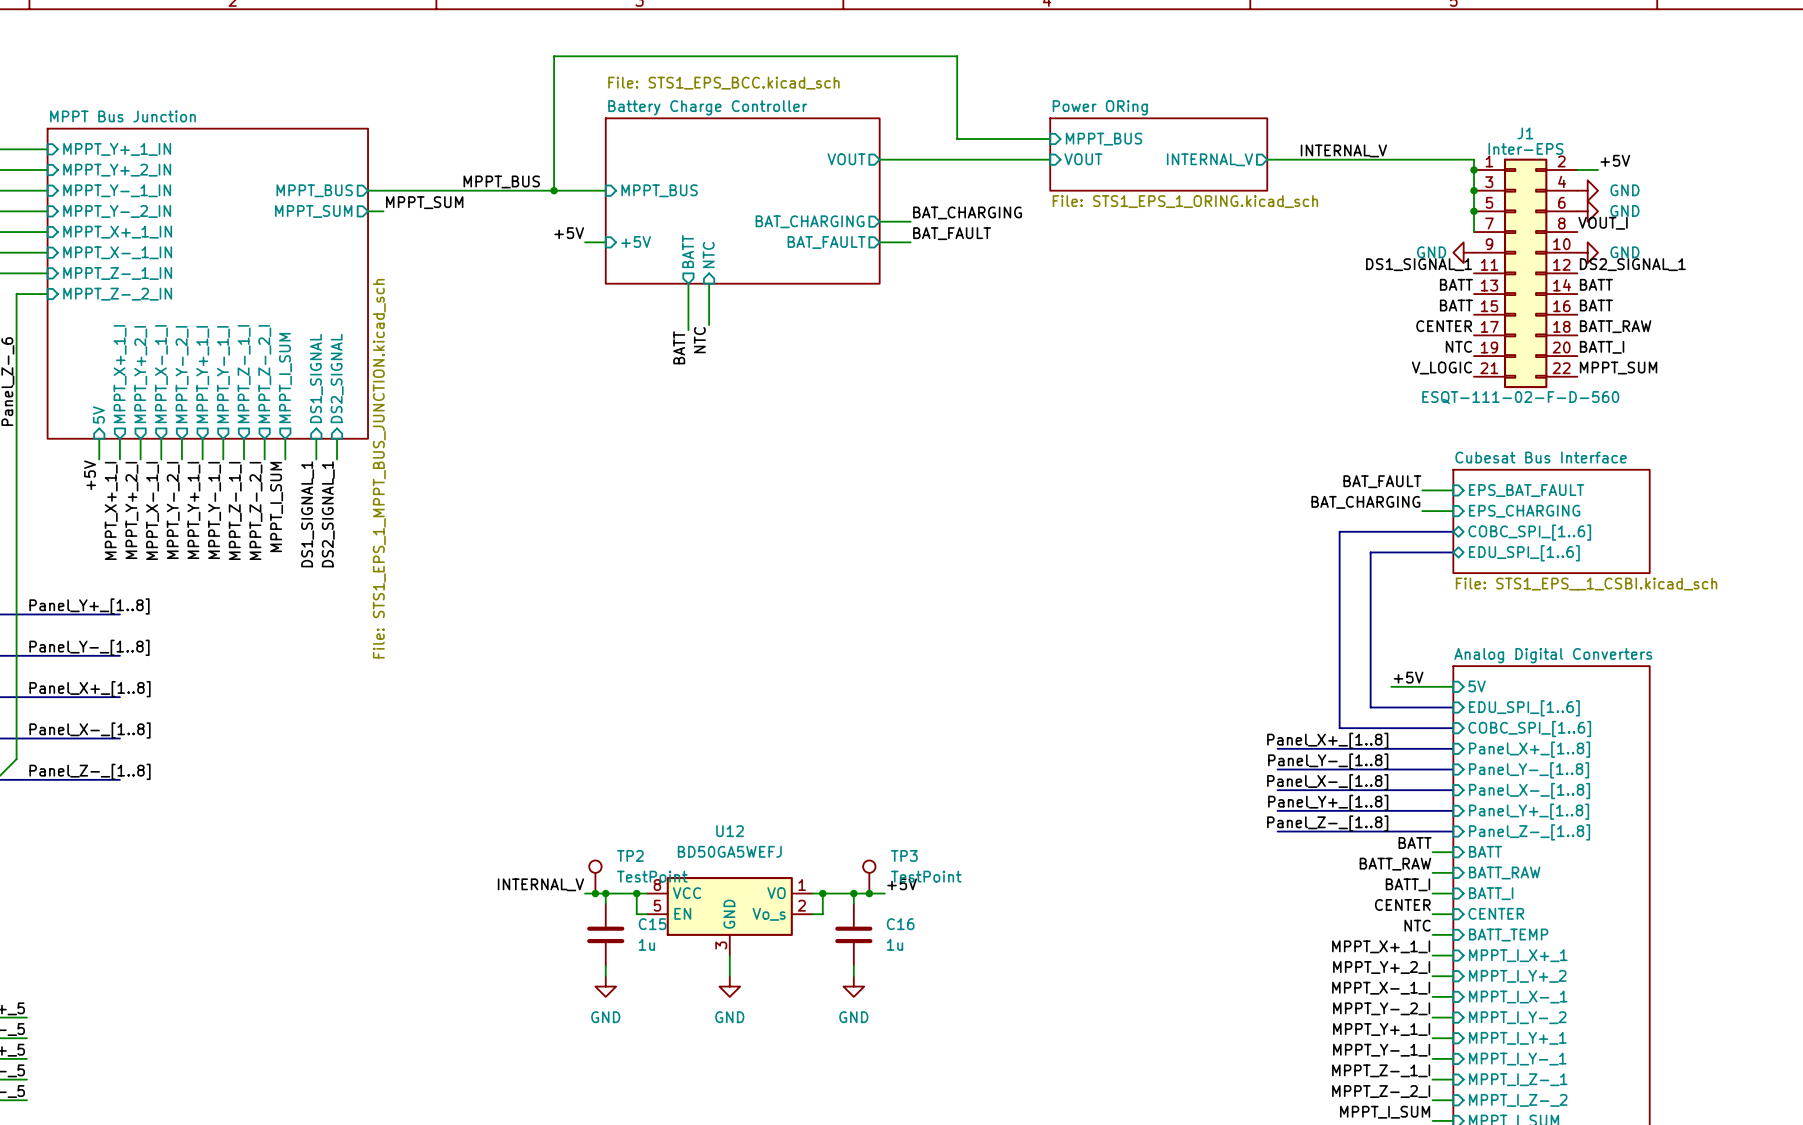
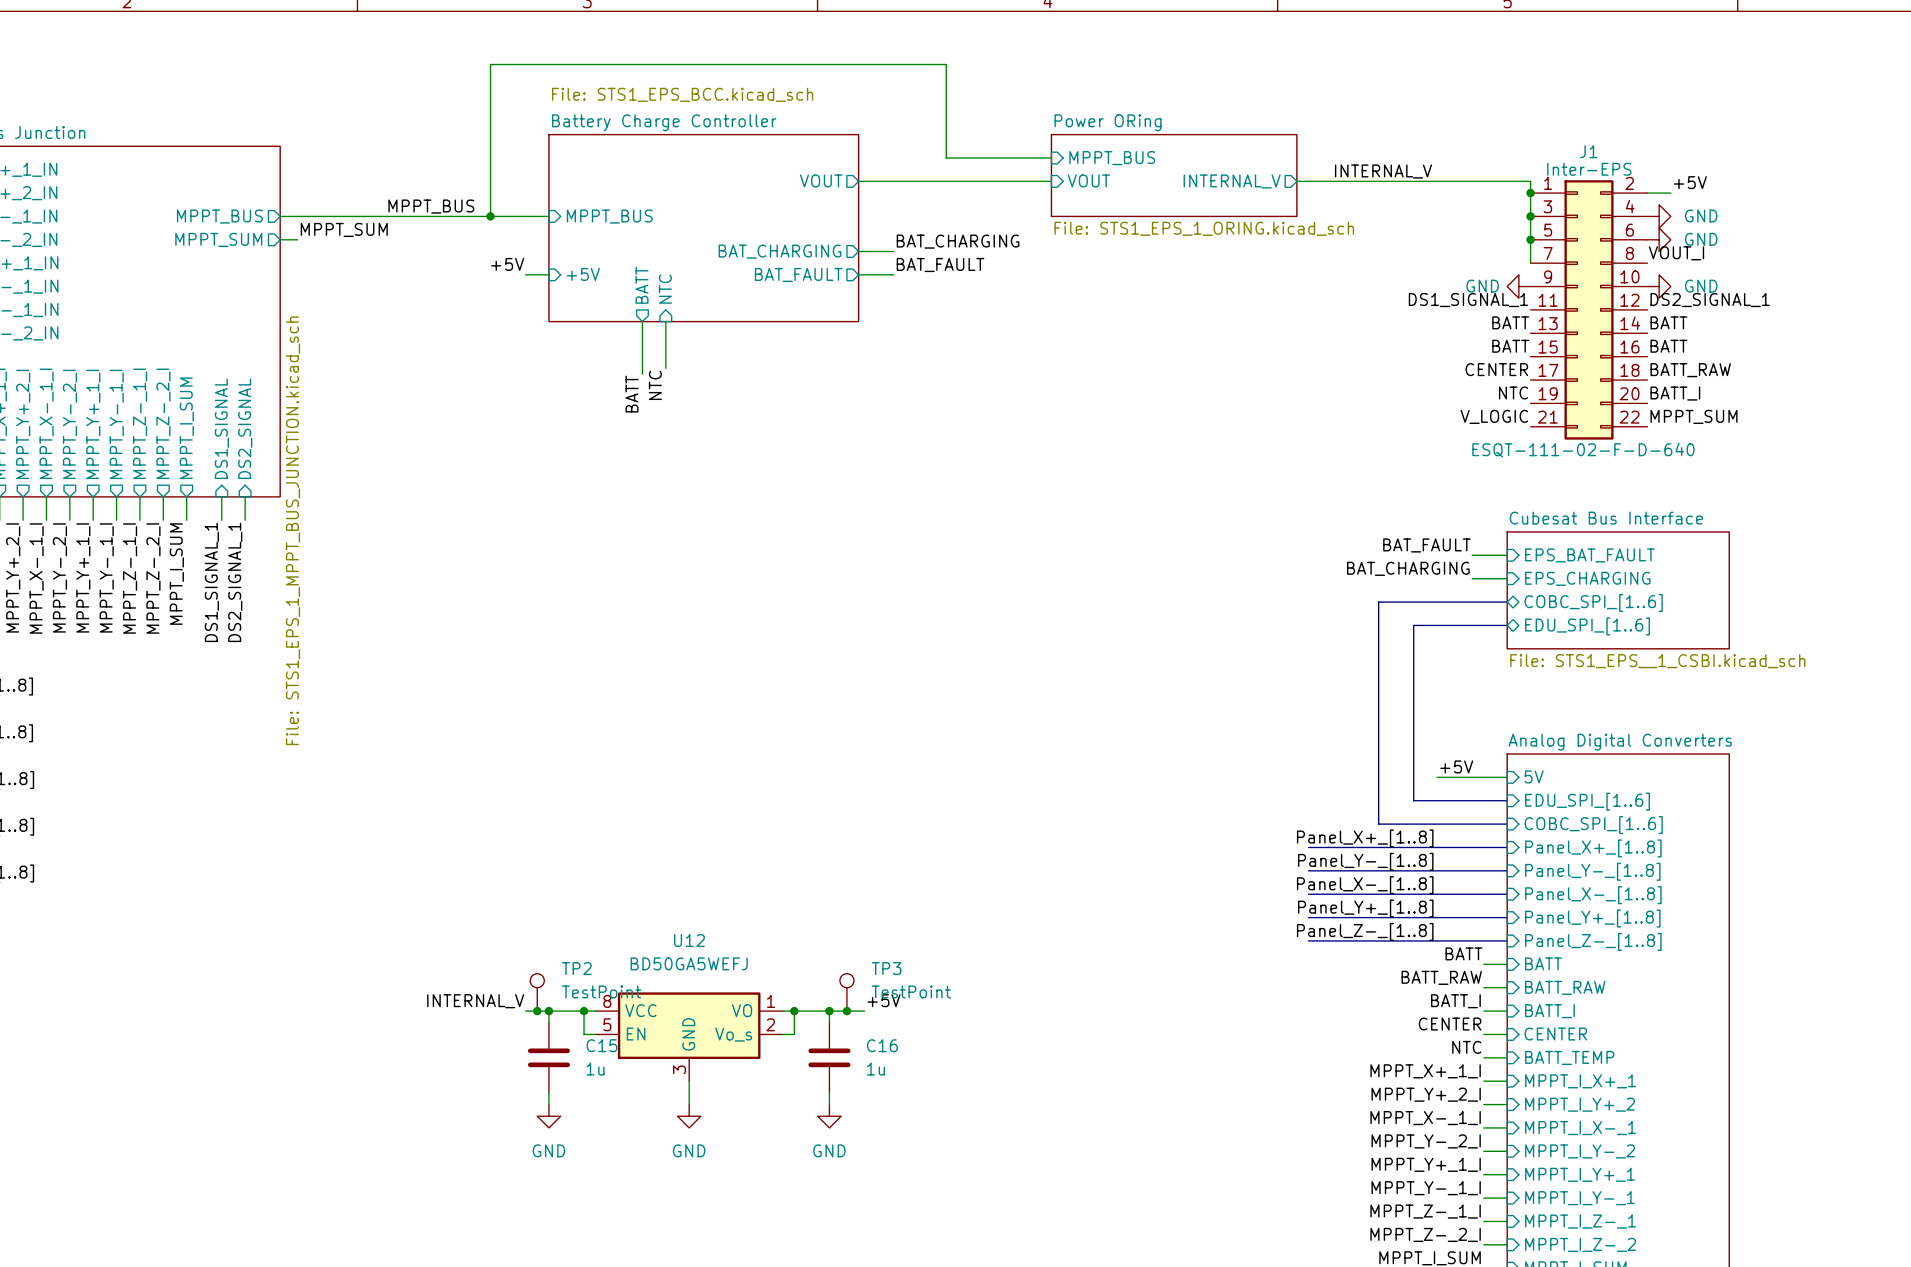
J1 text: ESQT-111-02-F-D-560 (1520, 397) -> ESQT-111-02-F-D-640 (1583, 449)

